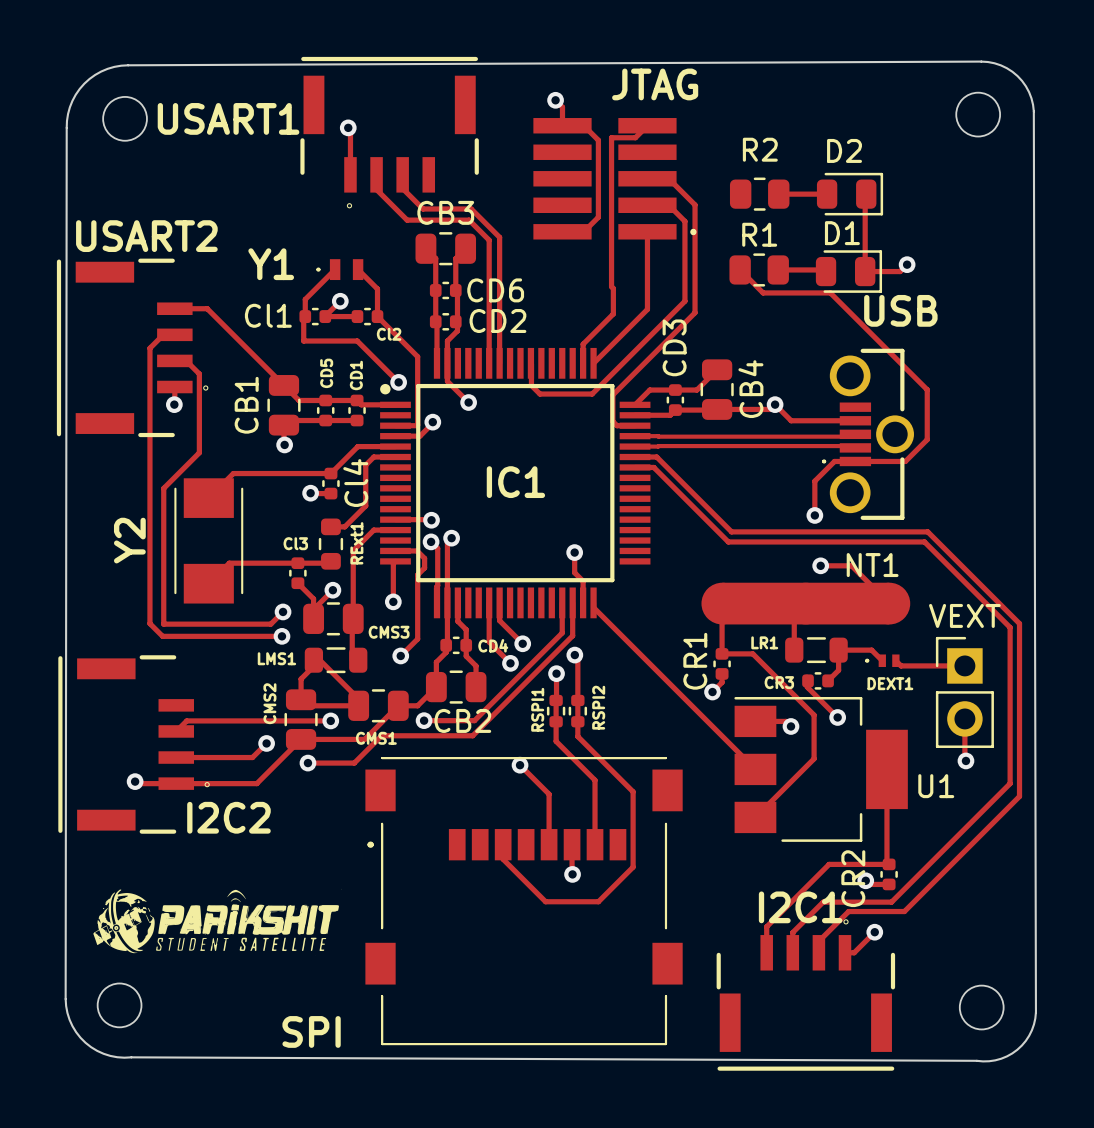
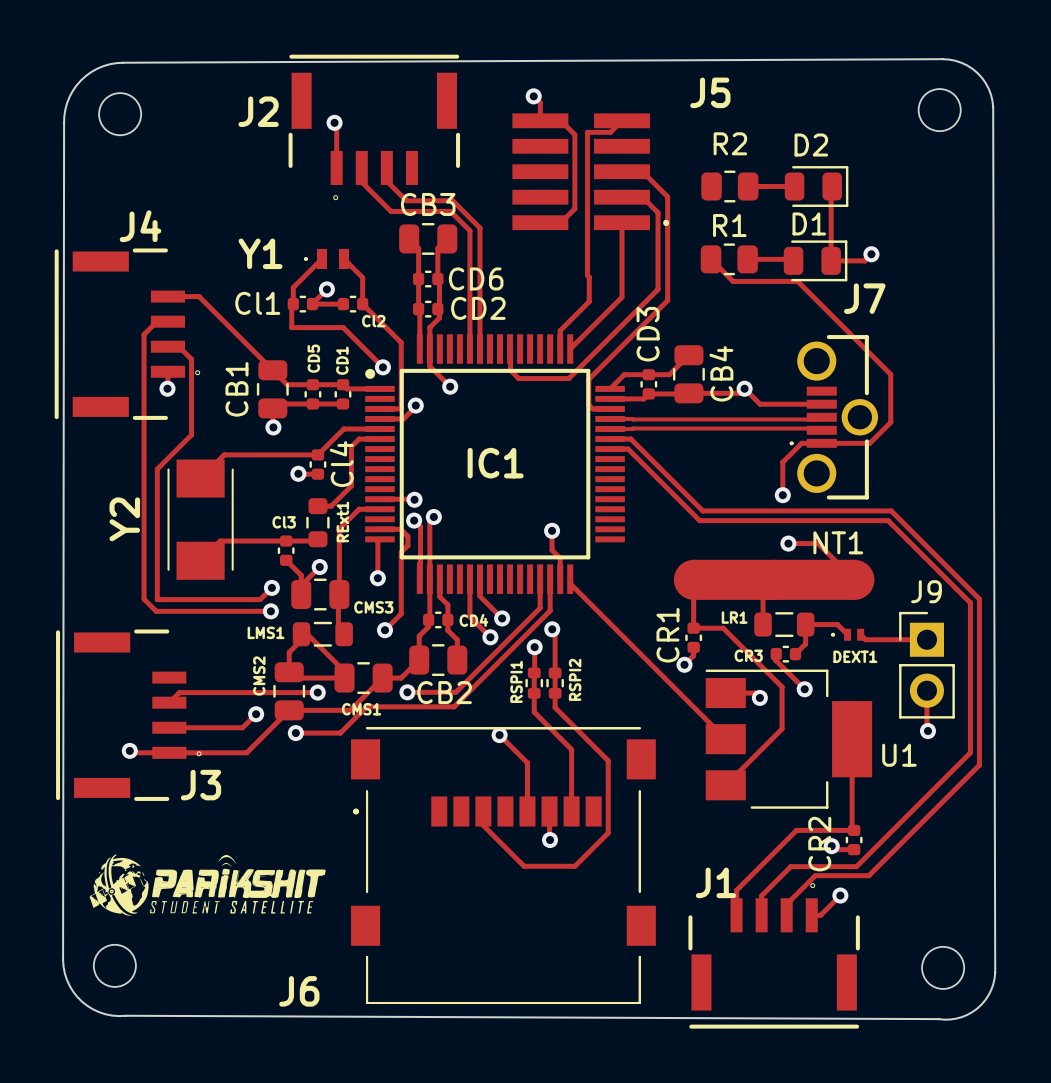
JTAG name: JTAG (655, 84) -> J5 (710, 92)
USART1 name: USART1 (228, 118) -> J2 (258, 111)
USART2 name: USART2 (146, 236) -> J4 (140, 226)
USB name: USB (900, 310) -> J7 (864, 298)
VEXT name: VEXT (964, 615) -> J9 (926, 591)
I2C2 name: I2C2 (228, 817) -> J3 (201, 785)
I2C1 name: I2C1 (800, 907) -> J1 (715, 882)
SPI name: SPI (311, 1031) -> J6 (299, 991)

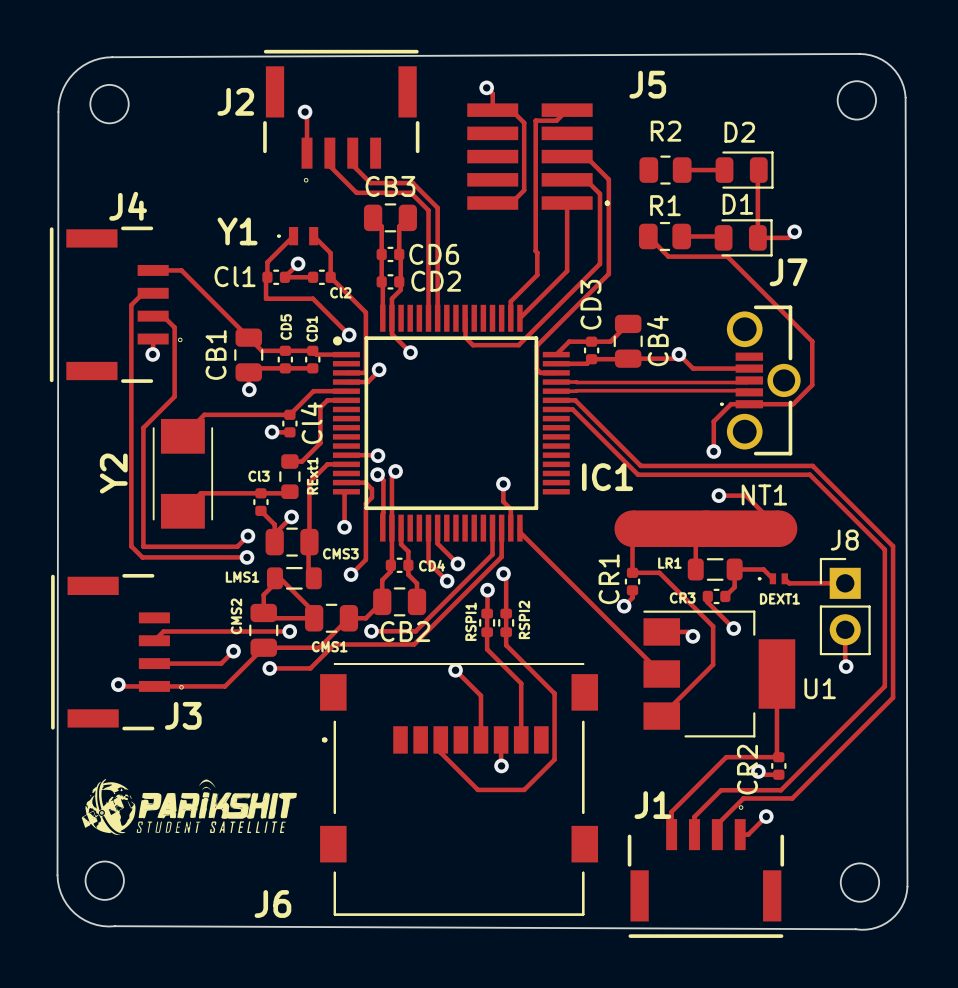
IC1 name position: IC1 (495, 463) -> IC1 (607, 477)
J9 name: J9 (926, 591) -> J8 (844, 540)

